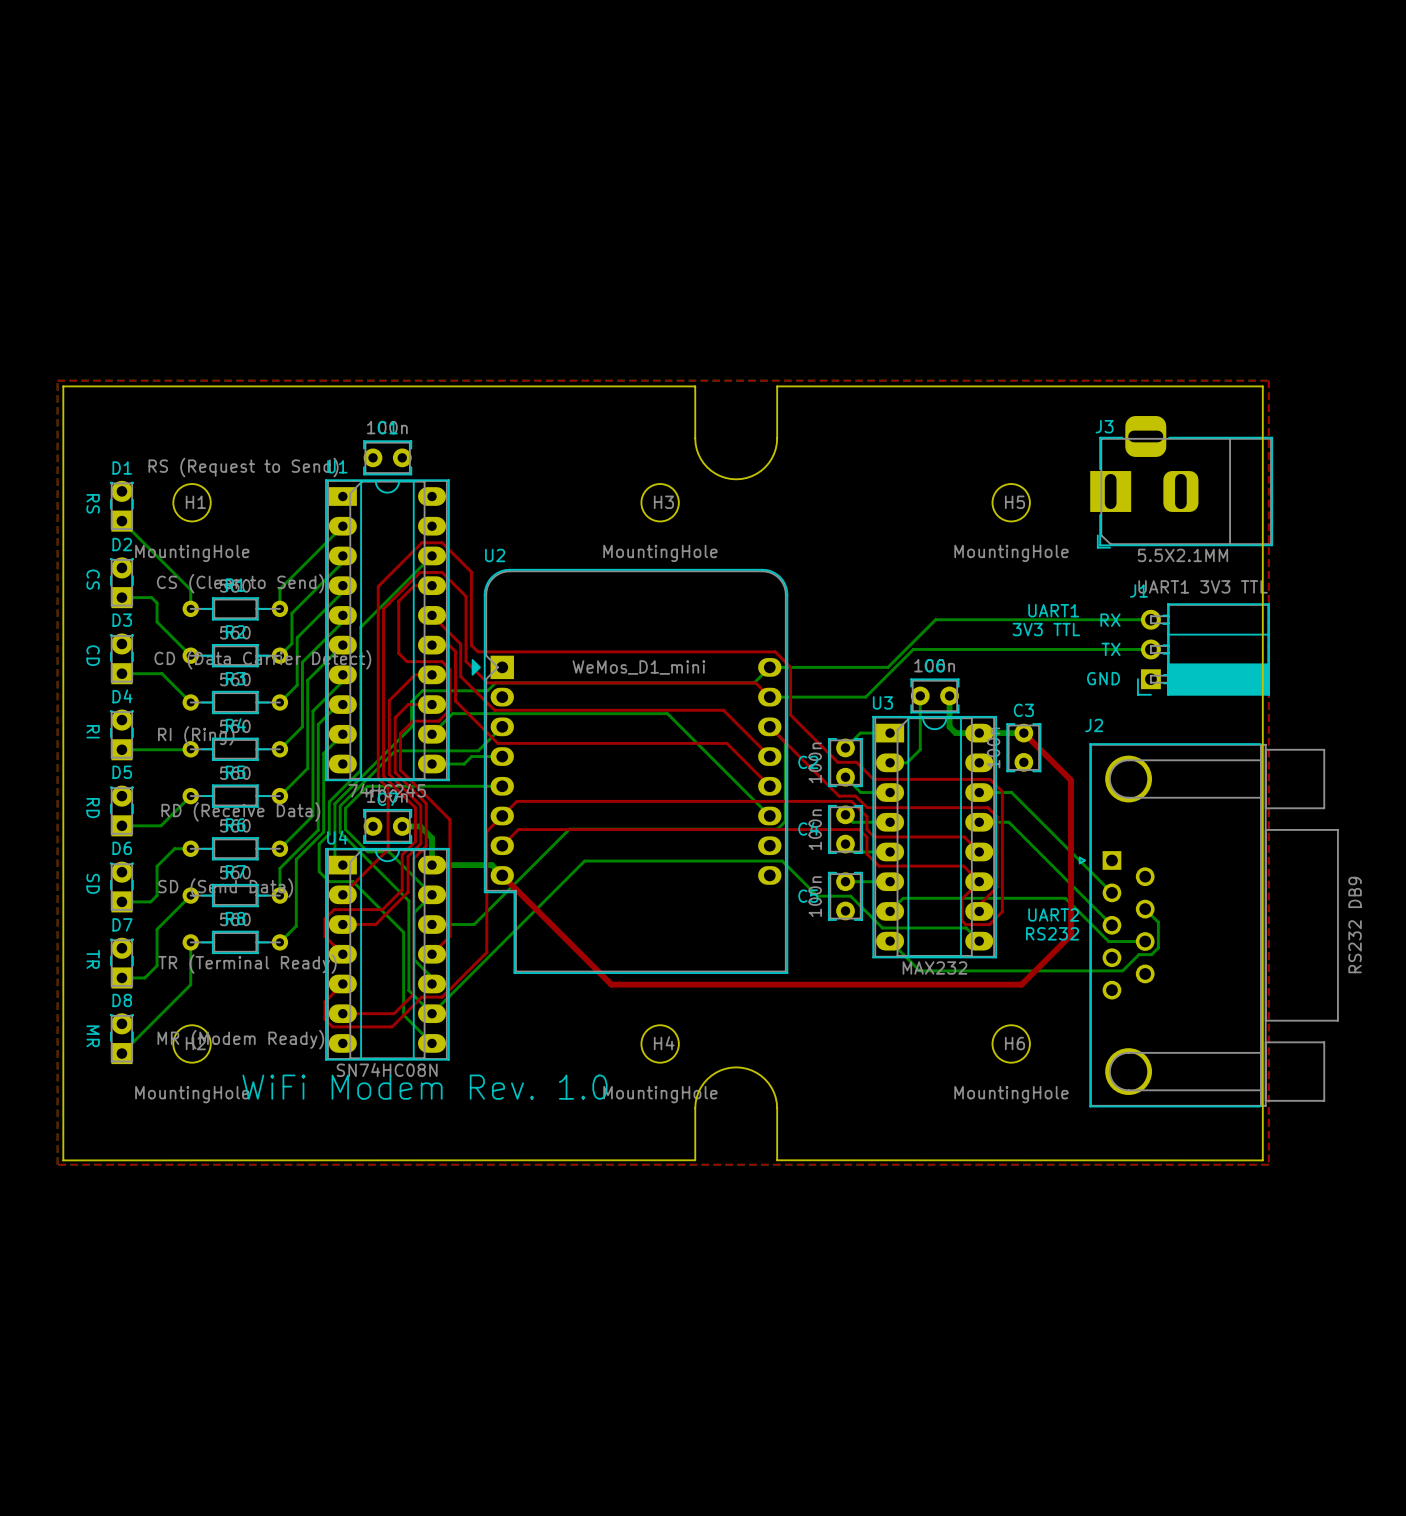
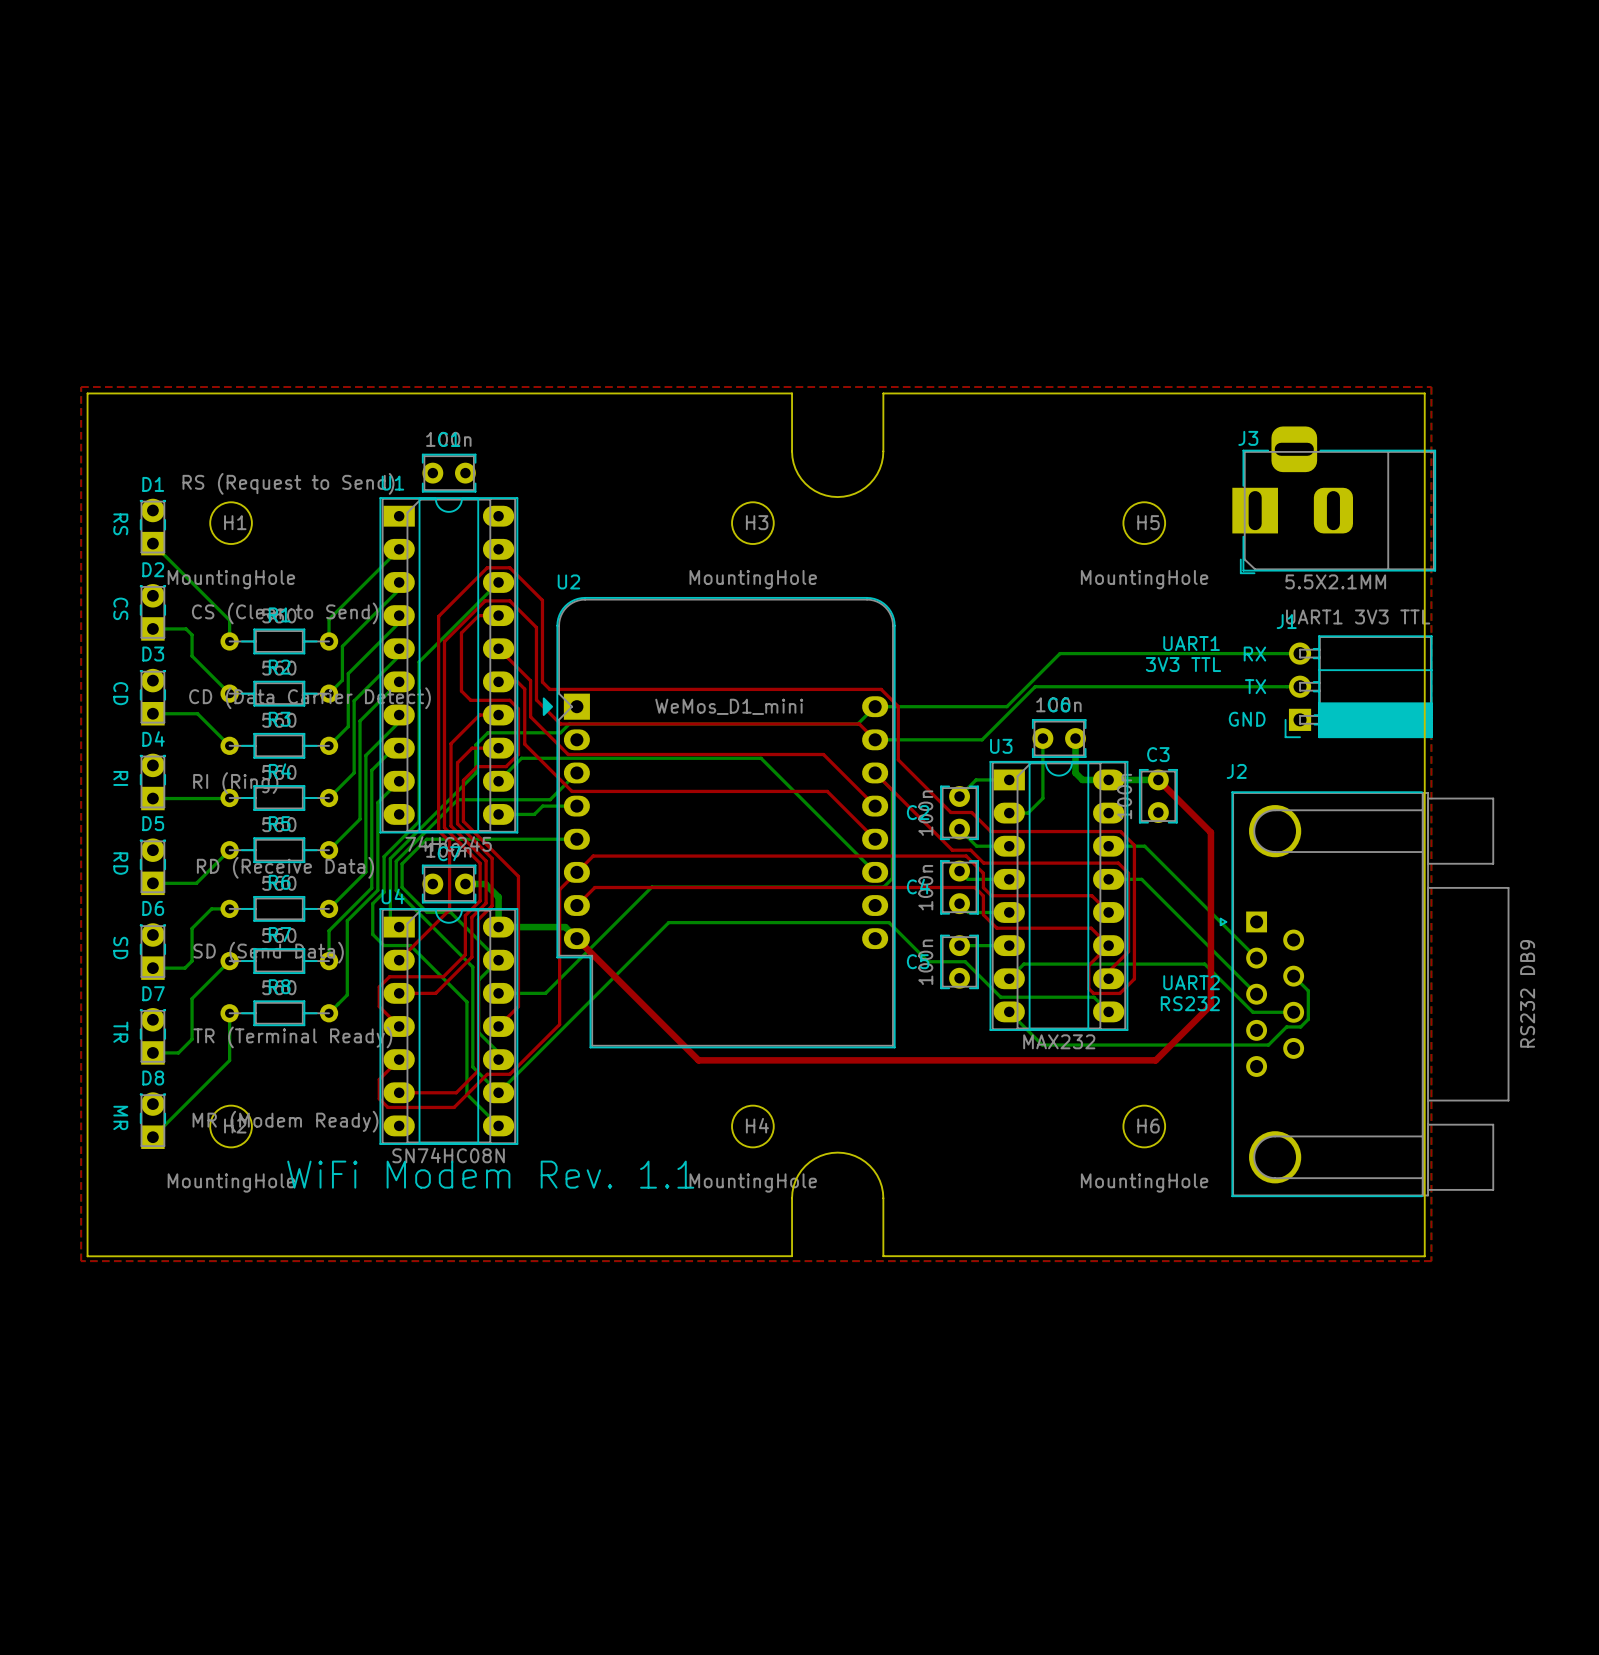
text: WiFi Modem Rev. 1.0 (424, 1087) -> WiFi Modem Rev. 1.1 (490, 1174)

